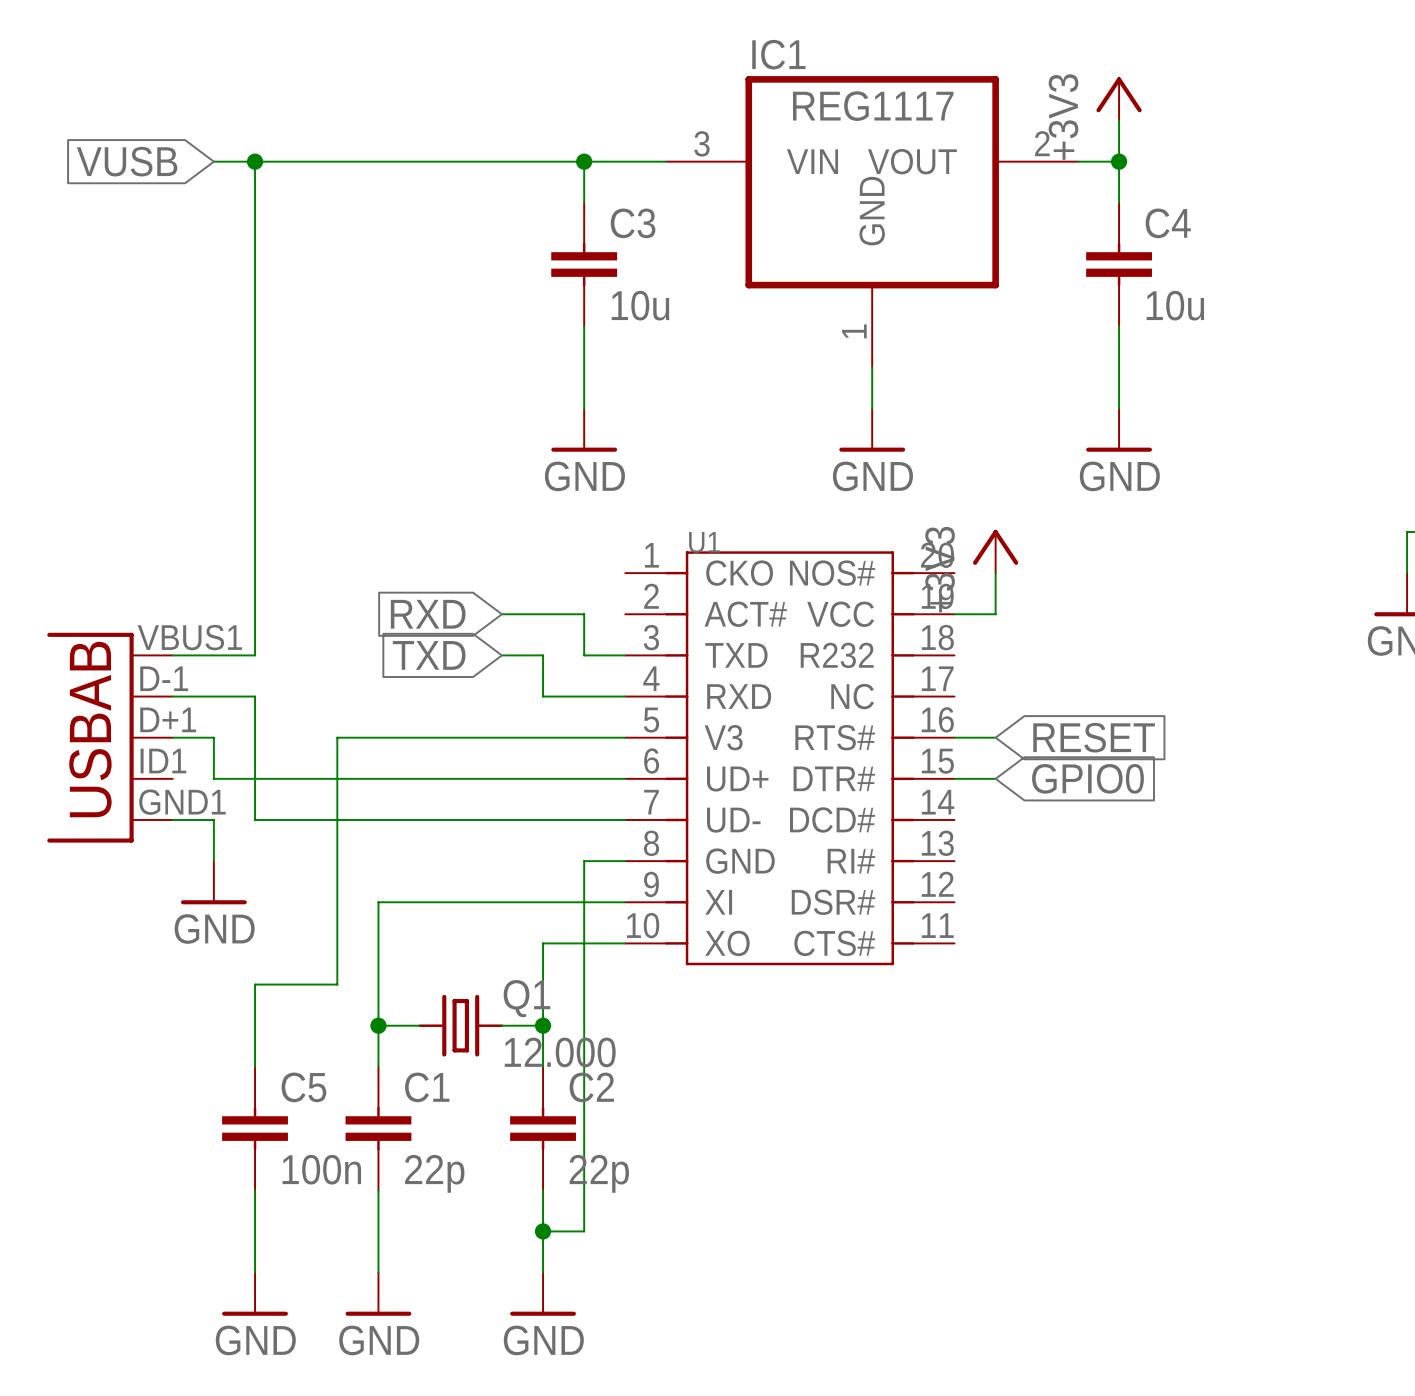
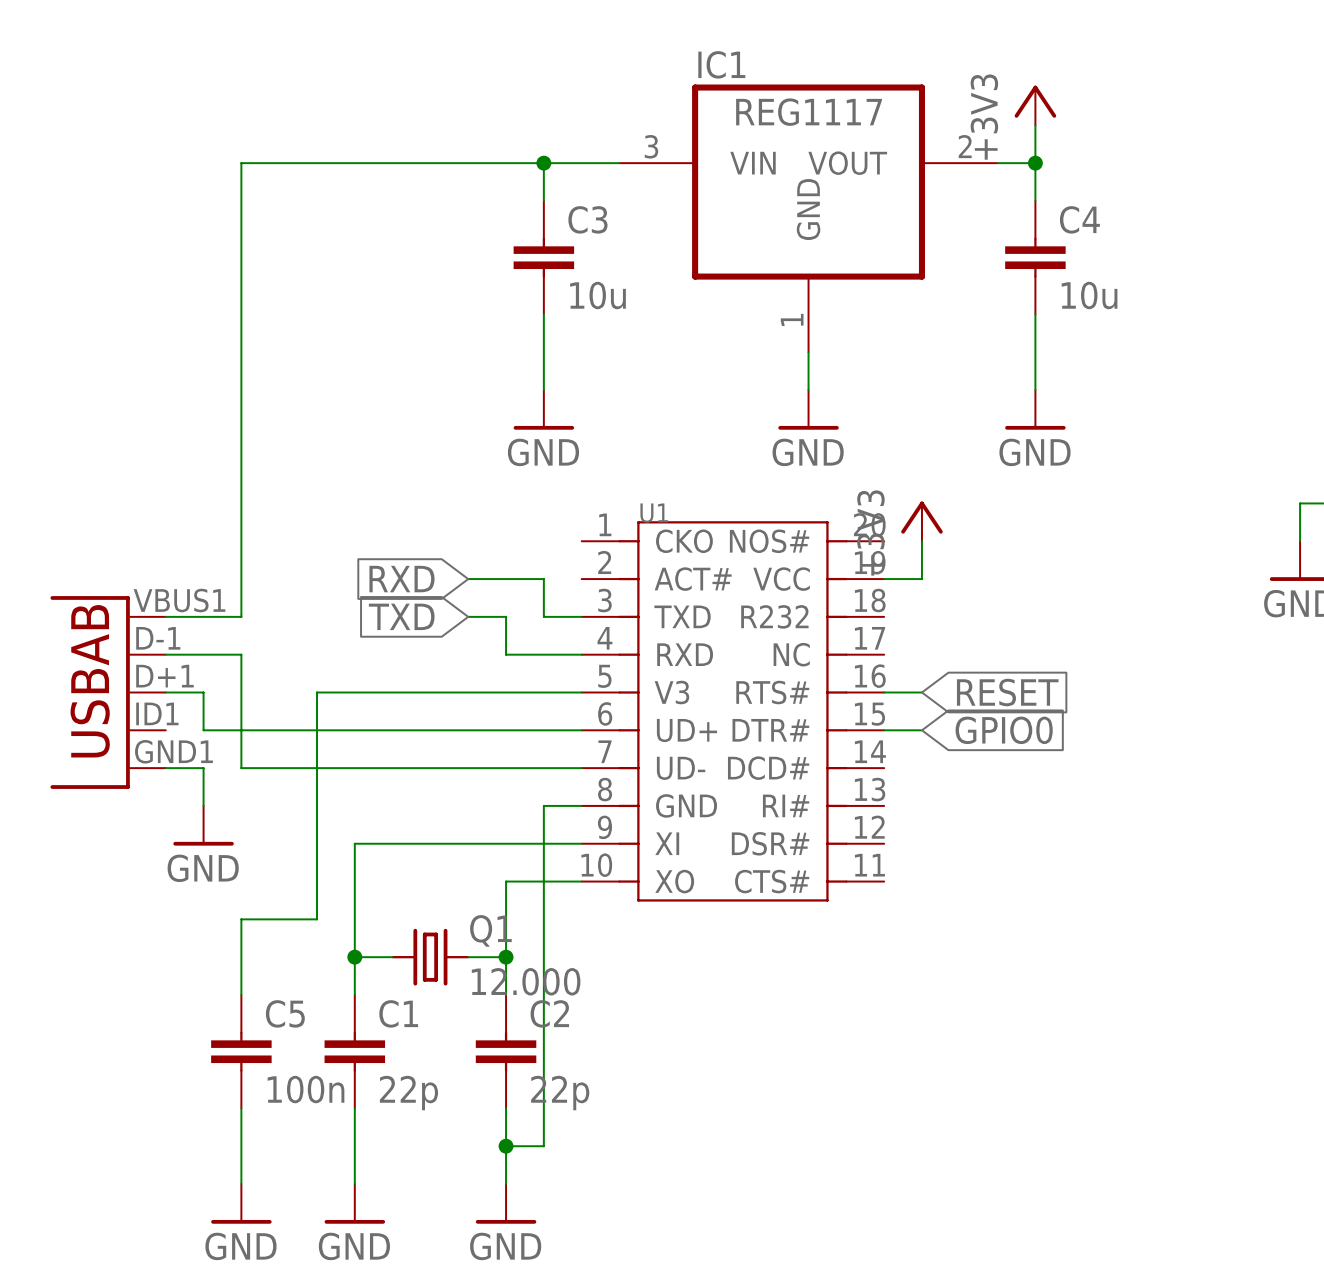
global label: VUSB (127, 161) -> none
wire: (213, 161) (255, 161) -> none
junction: (255, 161) -> none

